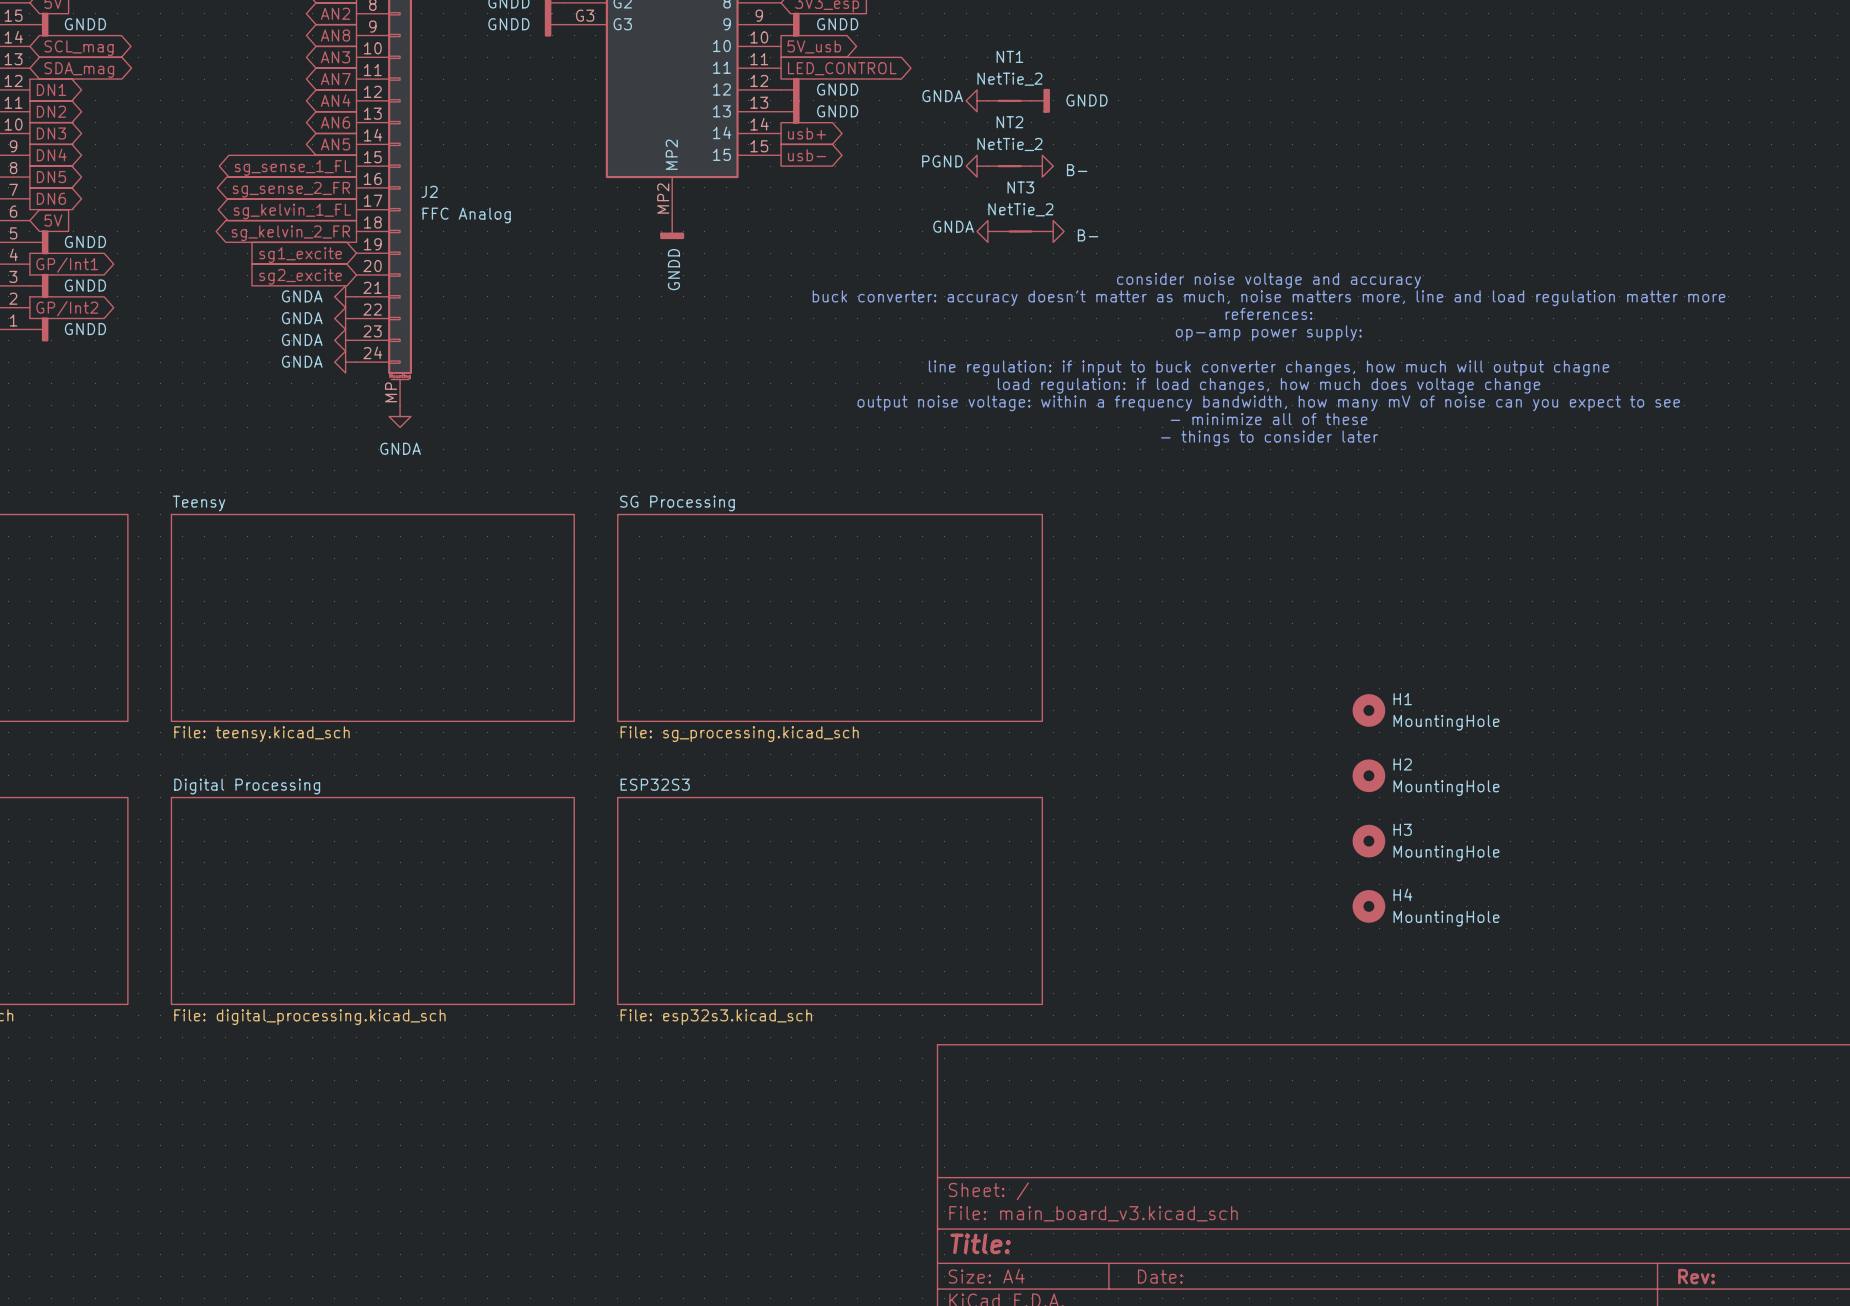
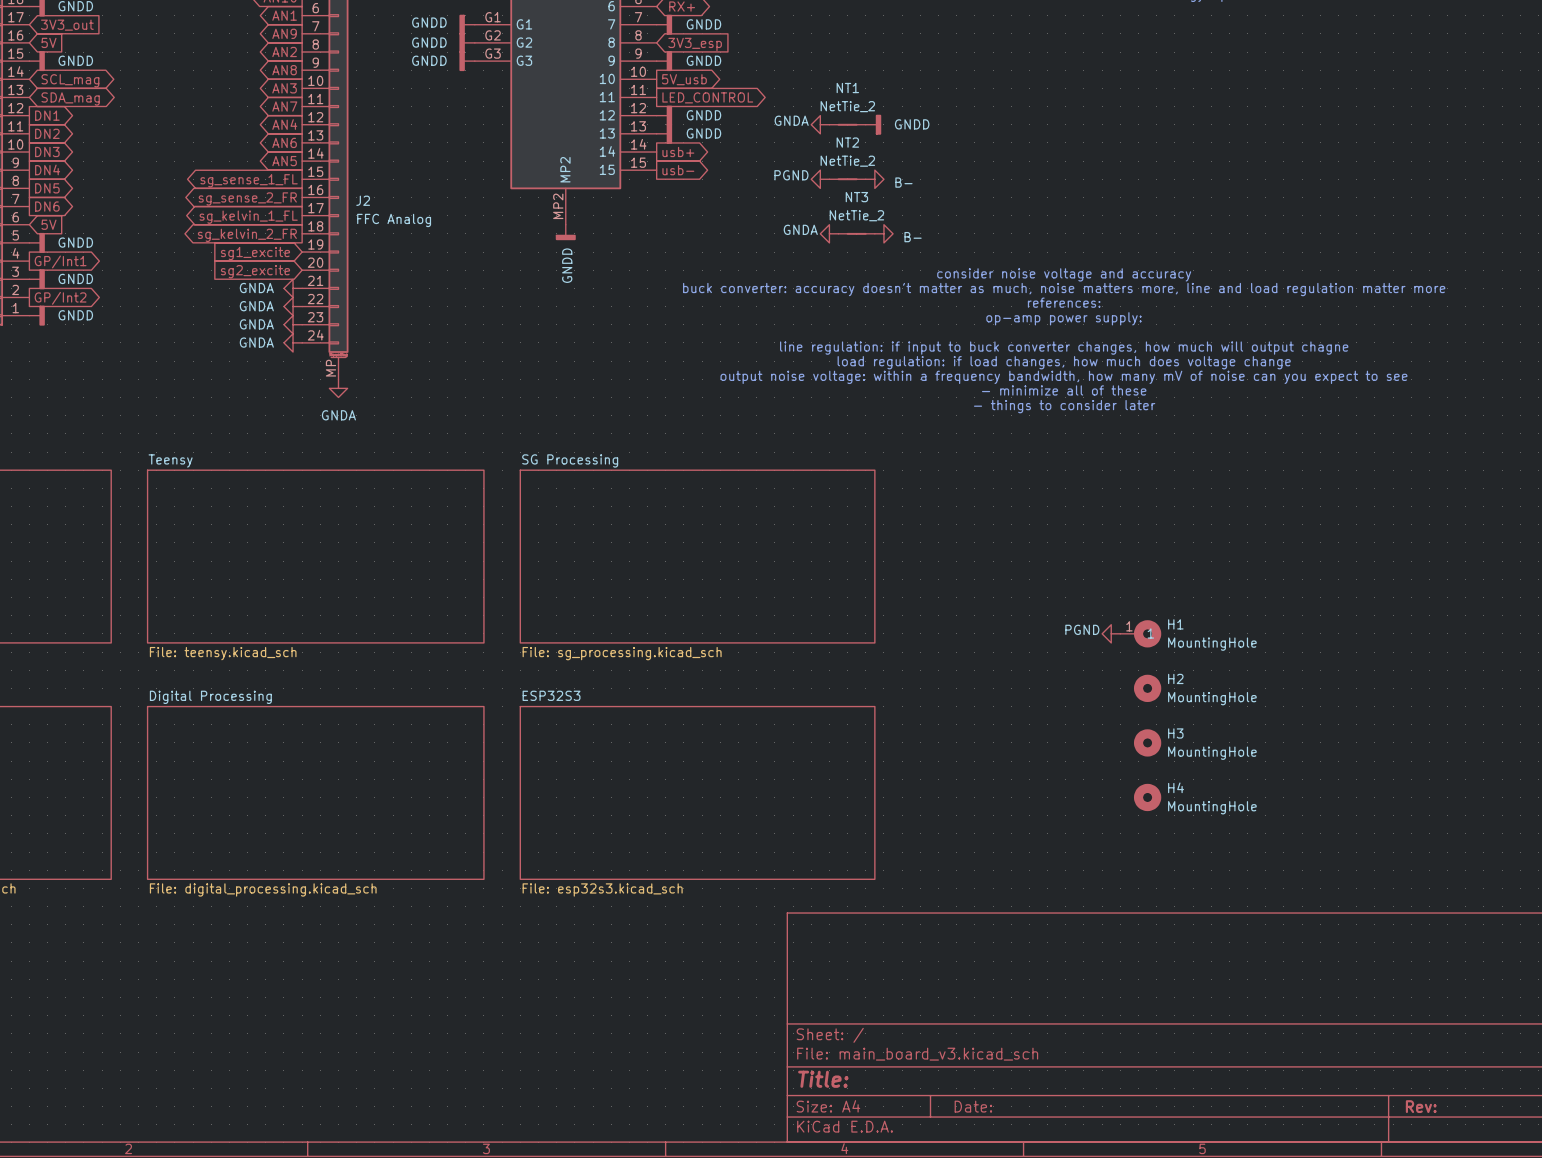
H1 symbol: [1352, 694, 1386, 727] -> [1120, 620, 1162, 648]
power symbol: none -> PGND (1111, 633)

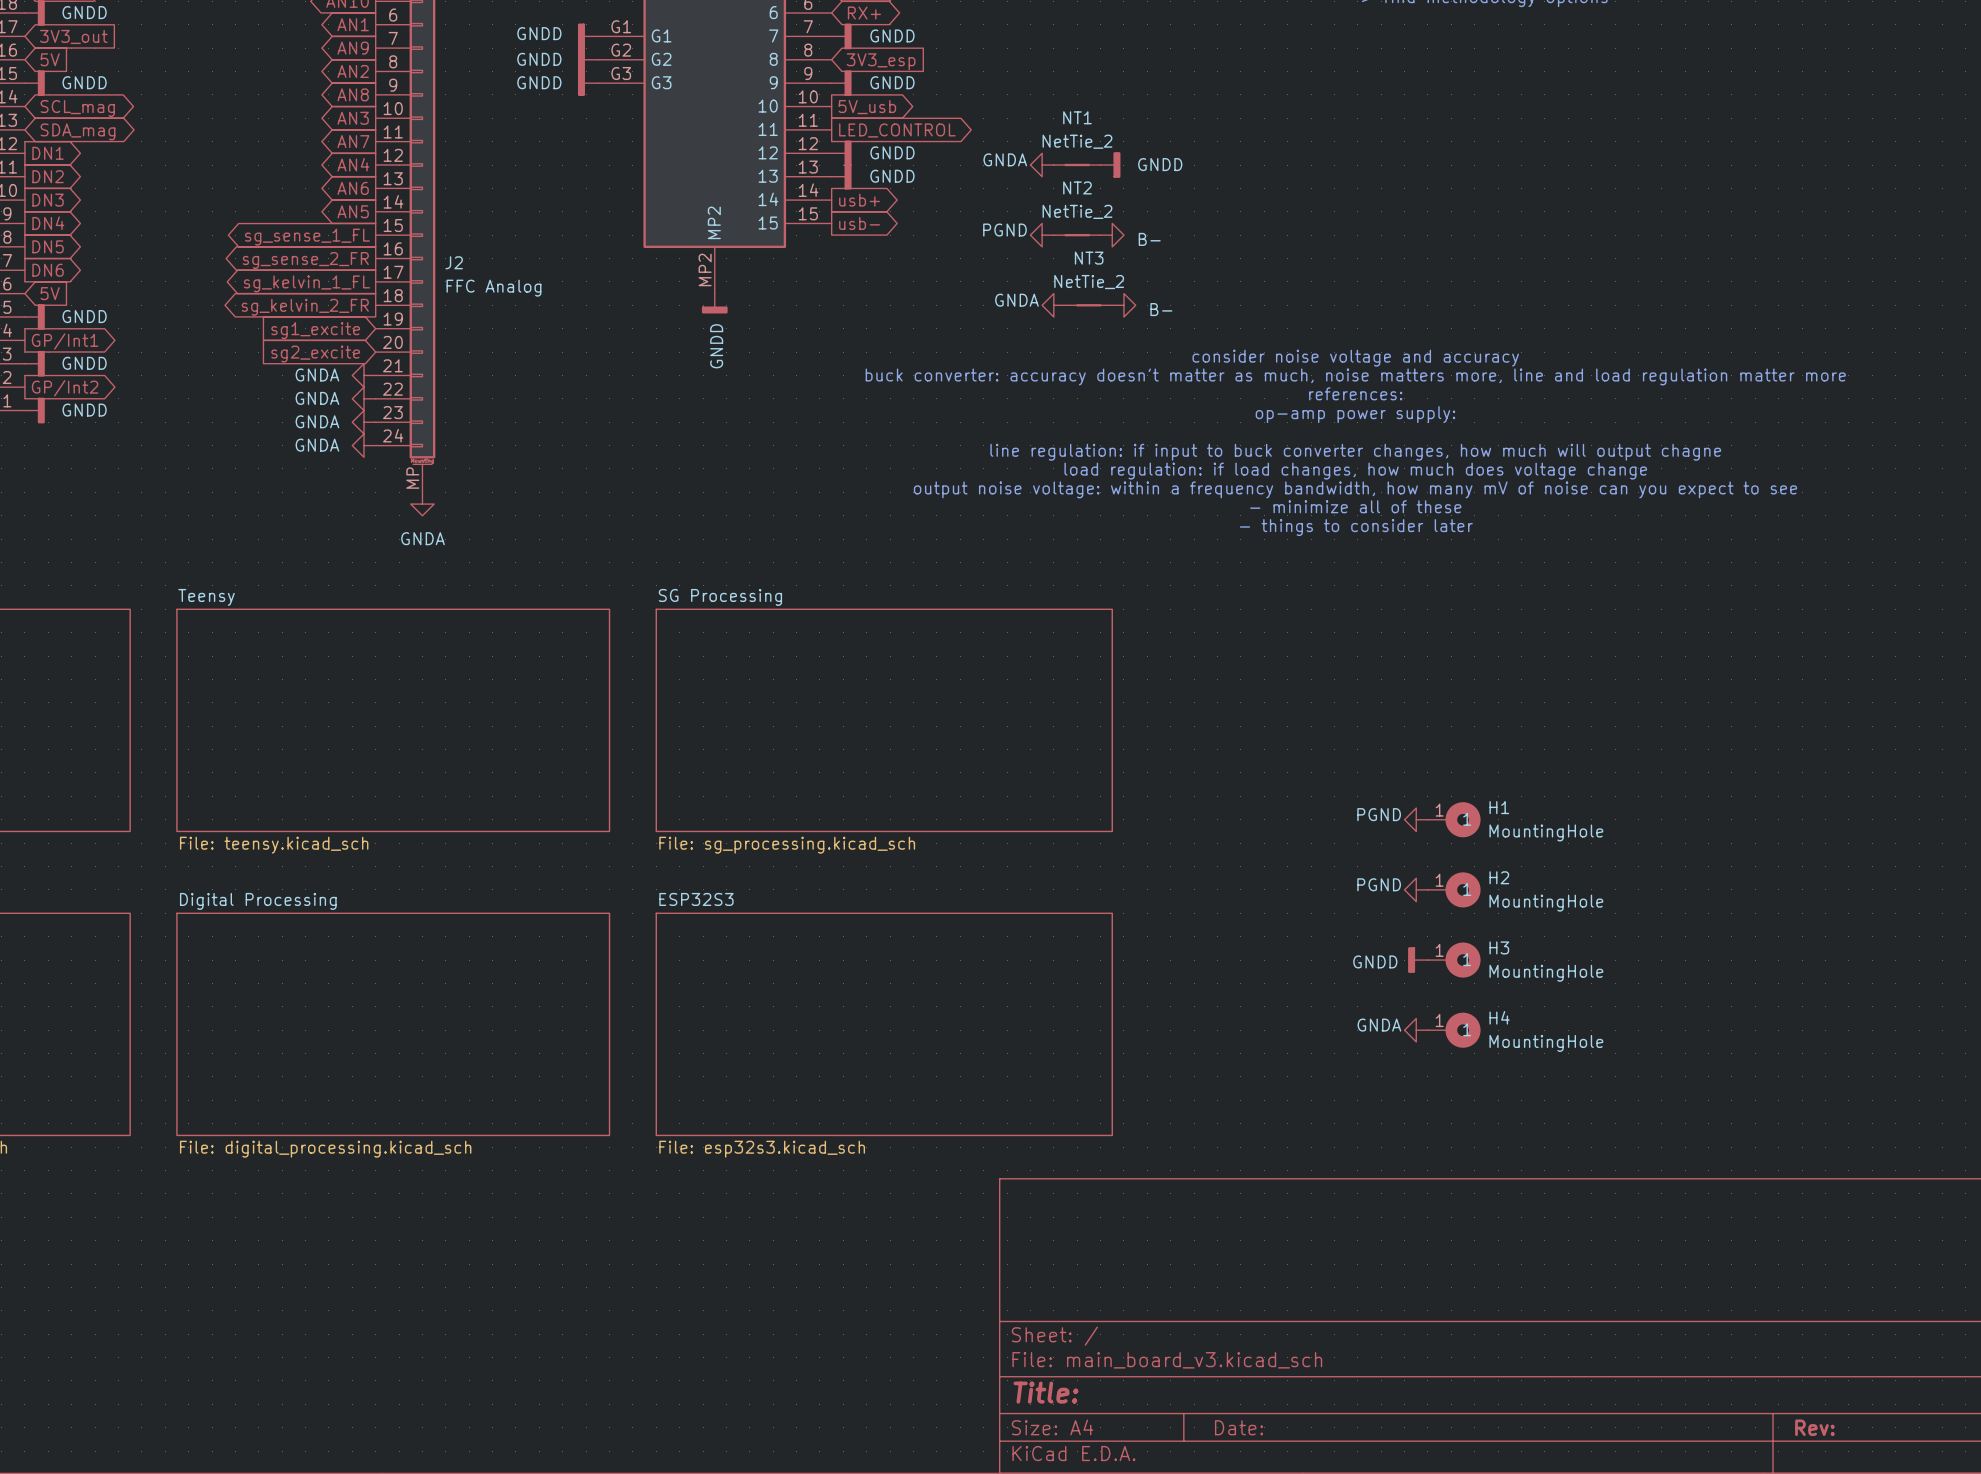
H2 symbol: [1133, 674, 1162, 703] -> [1427, 872, 1481, 908]
power symbol: none -> PGND (1416, 889)
H3 symbol: [1133, 729, 1162, 757] -> [1427, 942, 1481, 978]
power symbol: none -> GNDD (1418, 960)
H4 symbol: [1133, 783, 1162, 812] -> [1427, 1012, 1481, 1048]
power symbol: none -> GNDA (1416, 1030)

